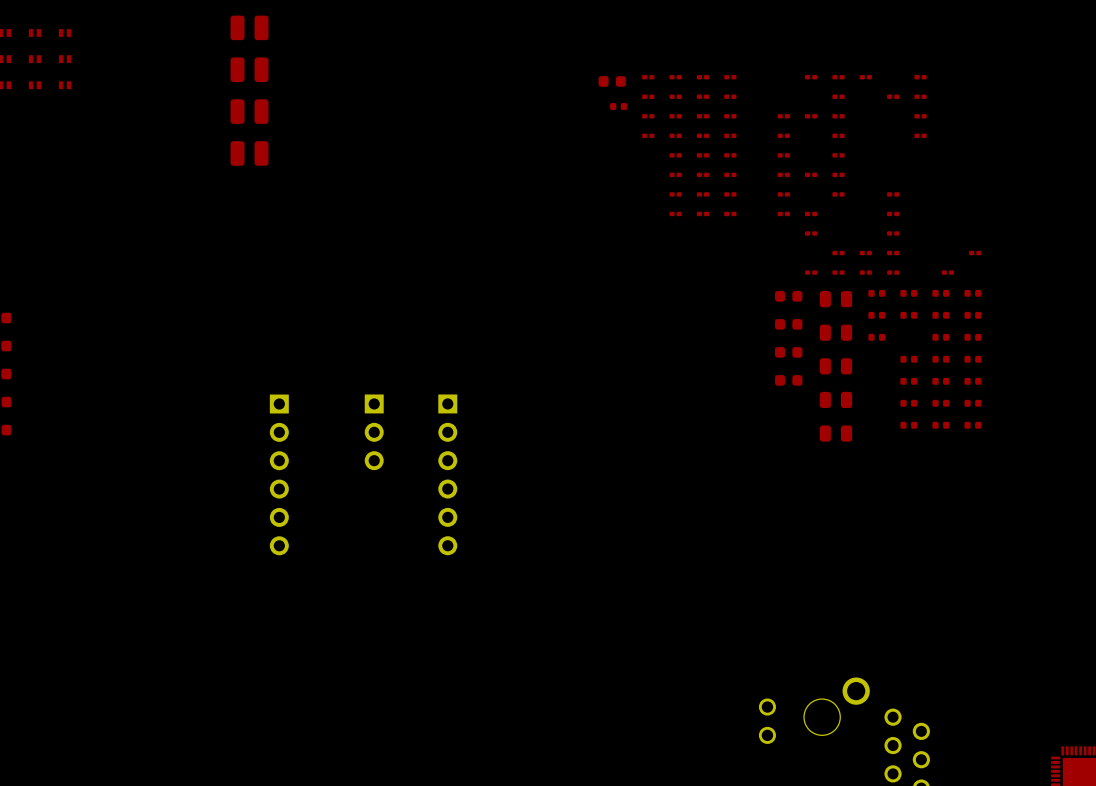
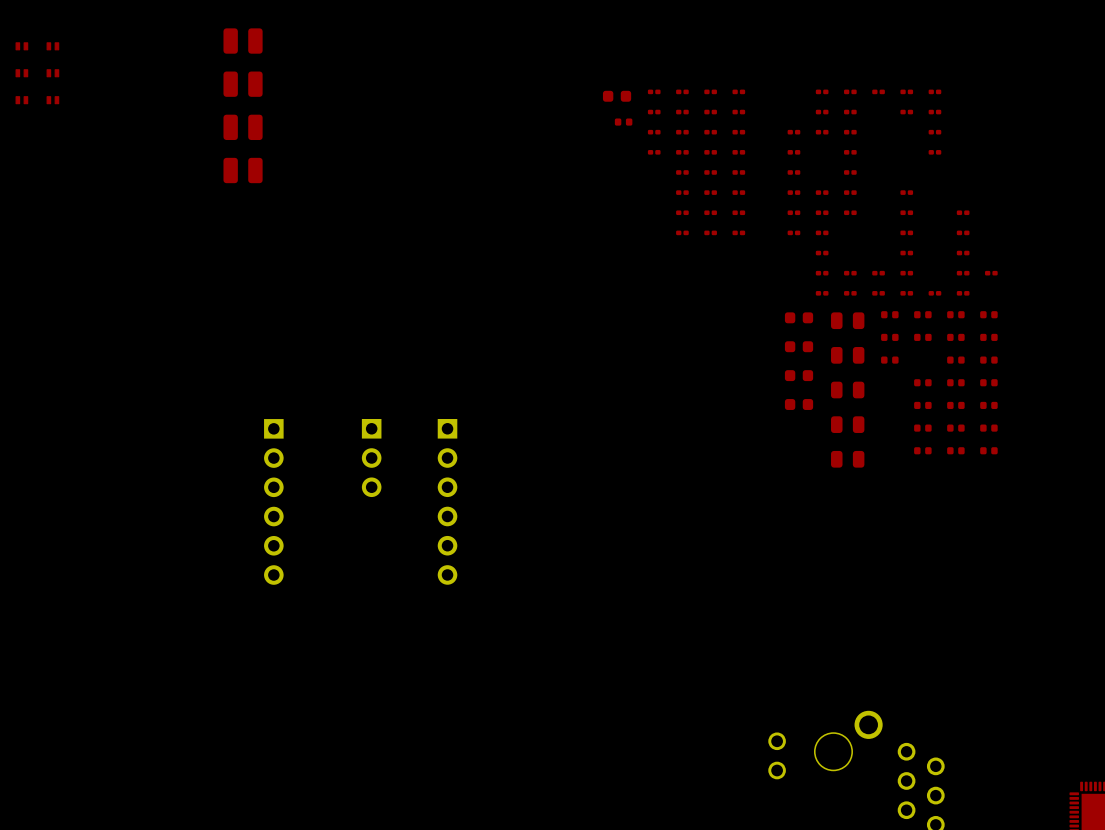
part: none -> (906, 91)
part: none -> (822, 112)
part: none -> (906, 192)
part: none -> (822, 212)
part: none -> (963, 212)
part: none -> (963, 232)
part: none -> (963, 253)
part: none -> (822, 273)
part: none -> (963, 273)
part: none -> (934, 293)

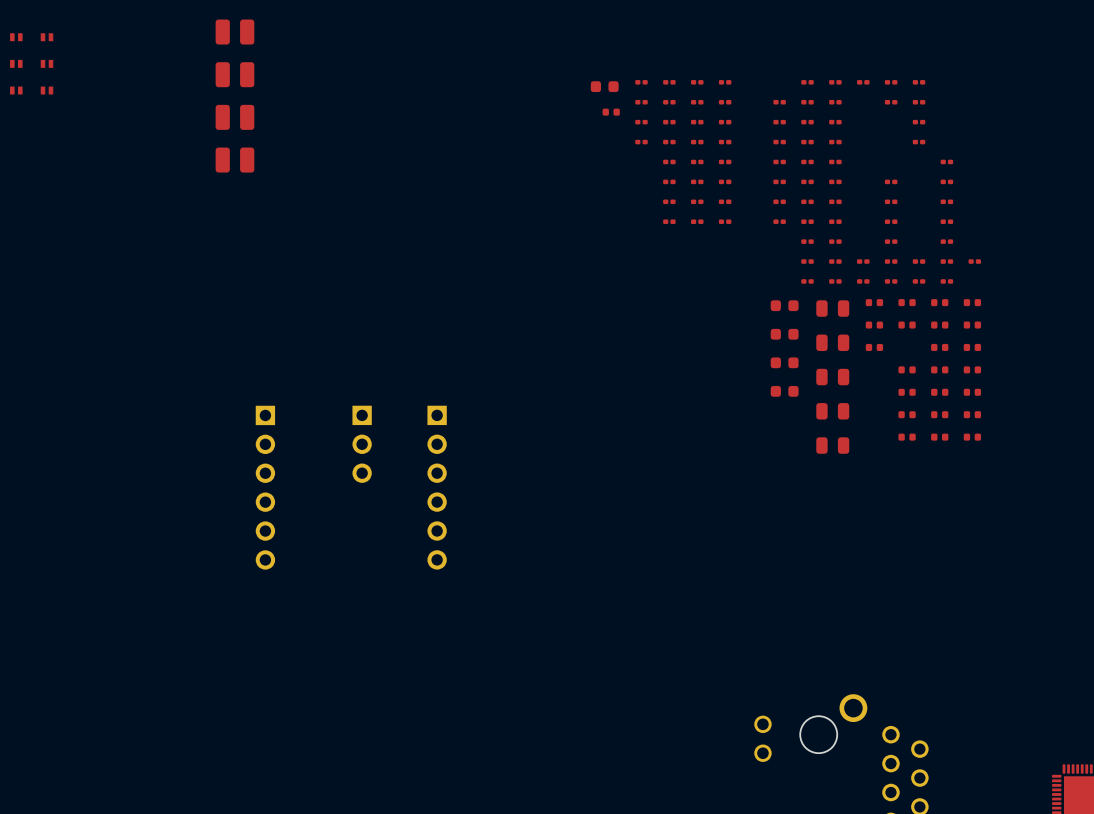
part: none -> (779, 102)
part: none -> (807, 142)
part: none -> (807, 161)
part: none -> (946, 161)
part: none -> (946, 181)
part: none -> (835, 221)
part: none -> (835, 241)
part: none -> (919, 261)

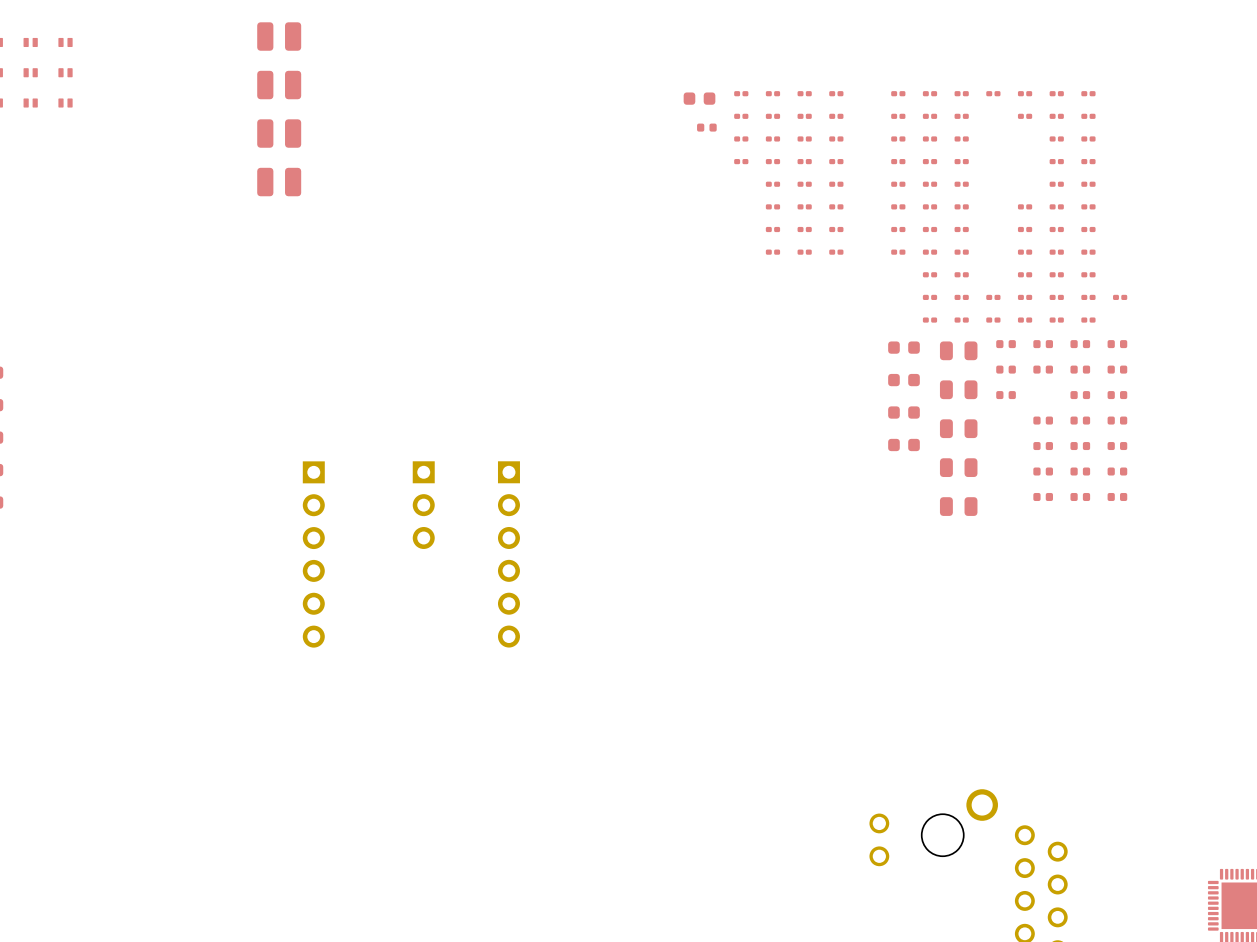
part: none -> (898, 93)
part: none -> (1088, 93)
part: none -> (1088, 116)
part: none -> (1088, 138)
part: none -> (1088, 161)
part: none -> (1056, 184)
part: none -> (1056, 206)
part: none -> (1056, 229)
part: none -> (1056, 252)
part: none -> (1056, 274)

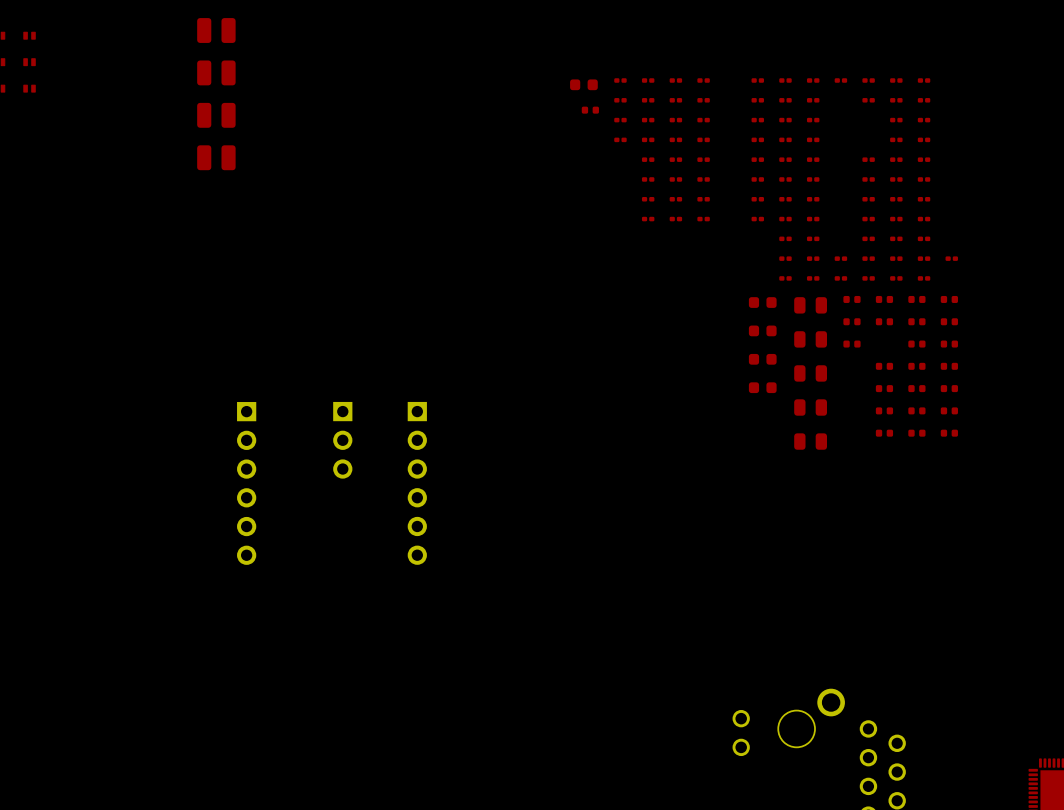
part: none -> (868, 159)

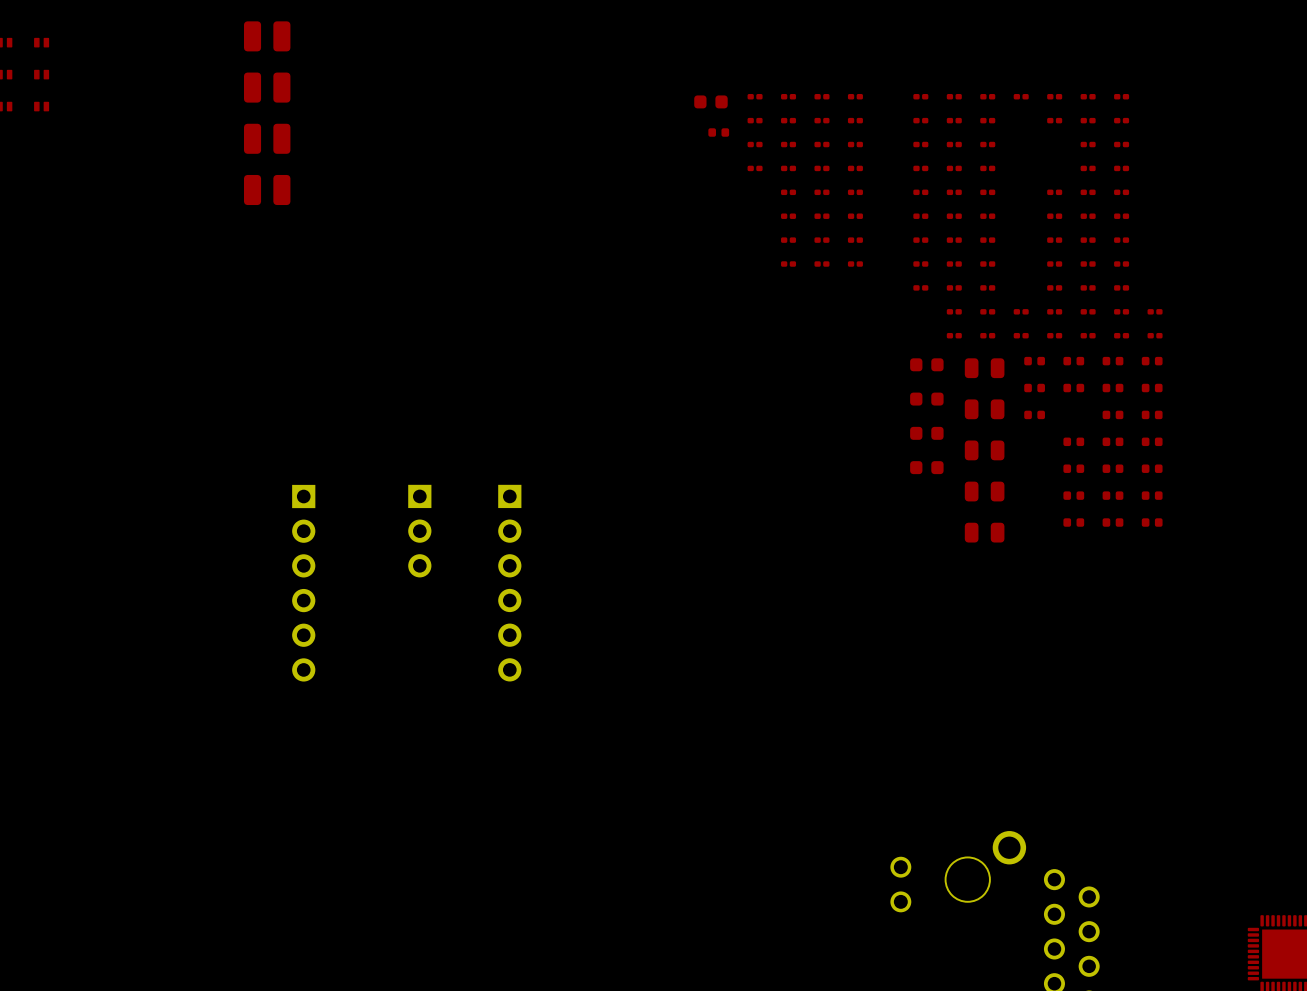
part: none -> (920, 287)
part: none -> (1155, 335)

